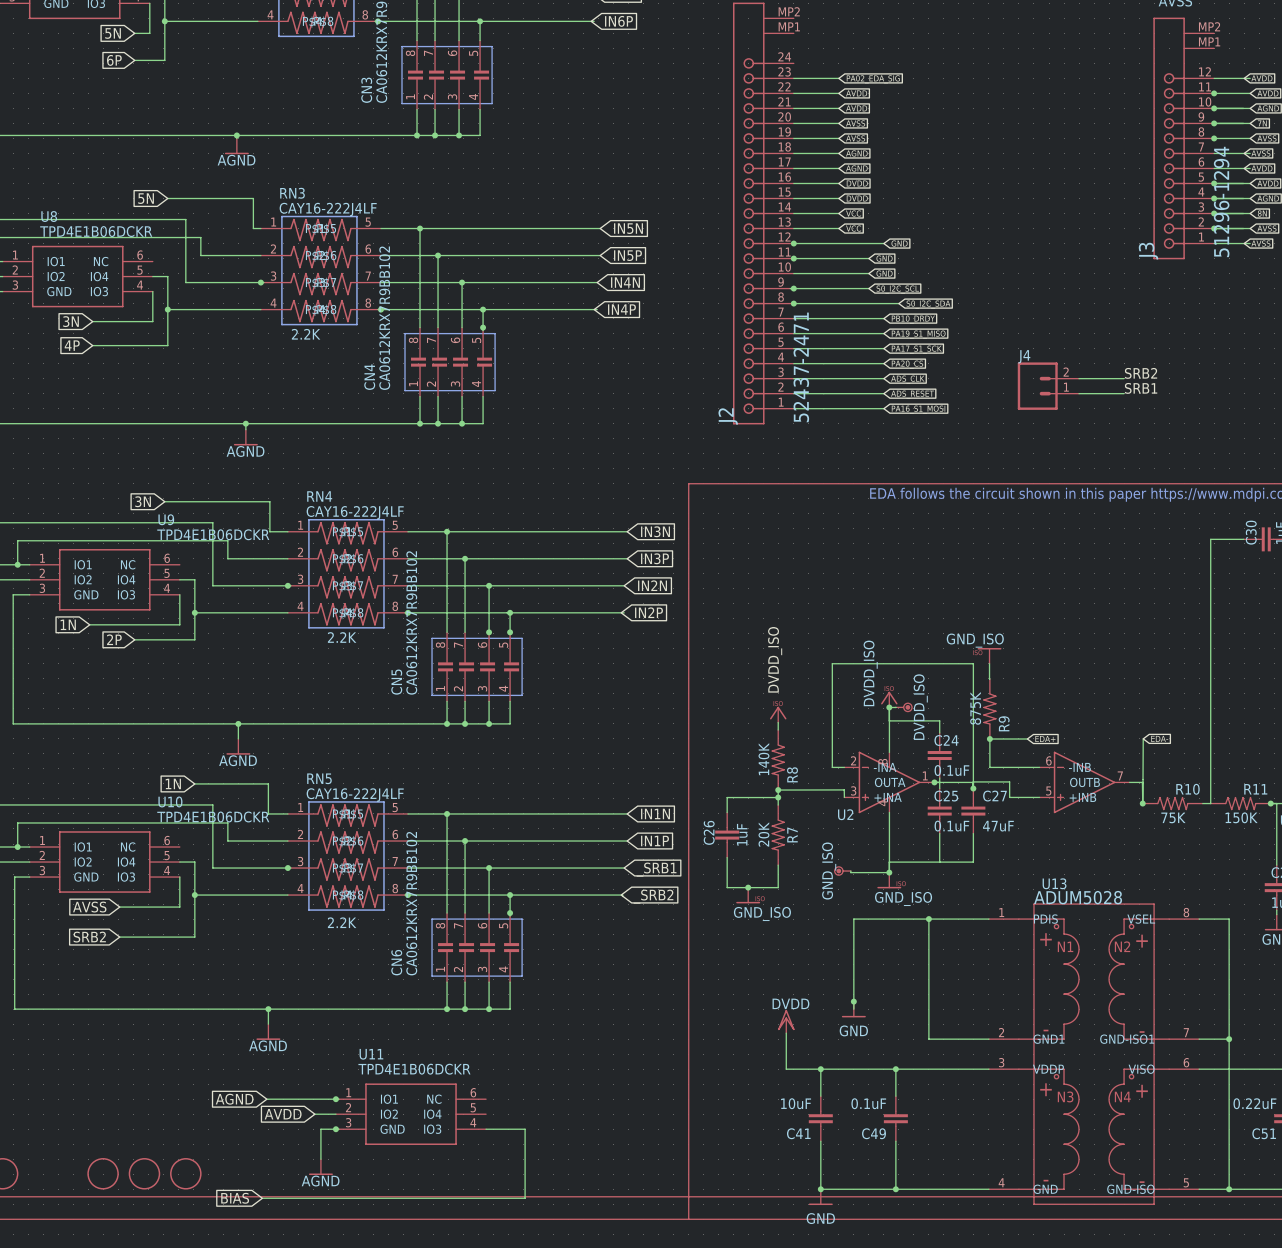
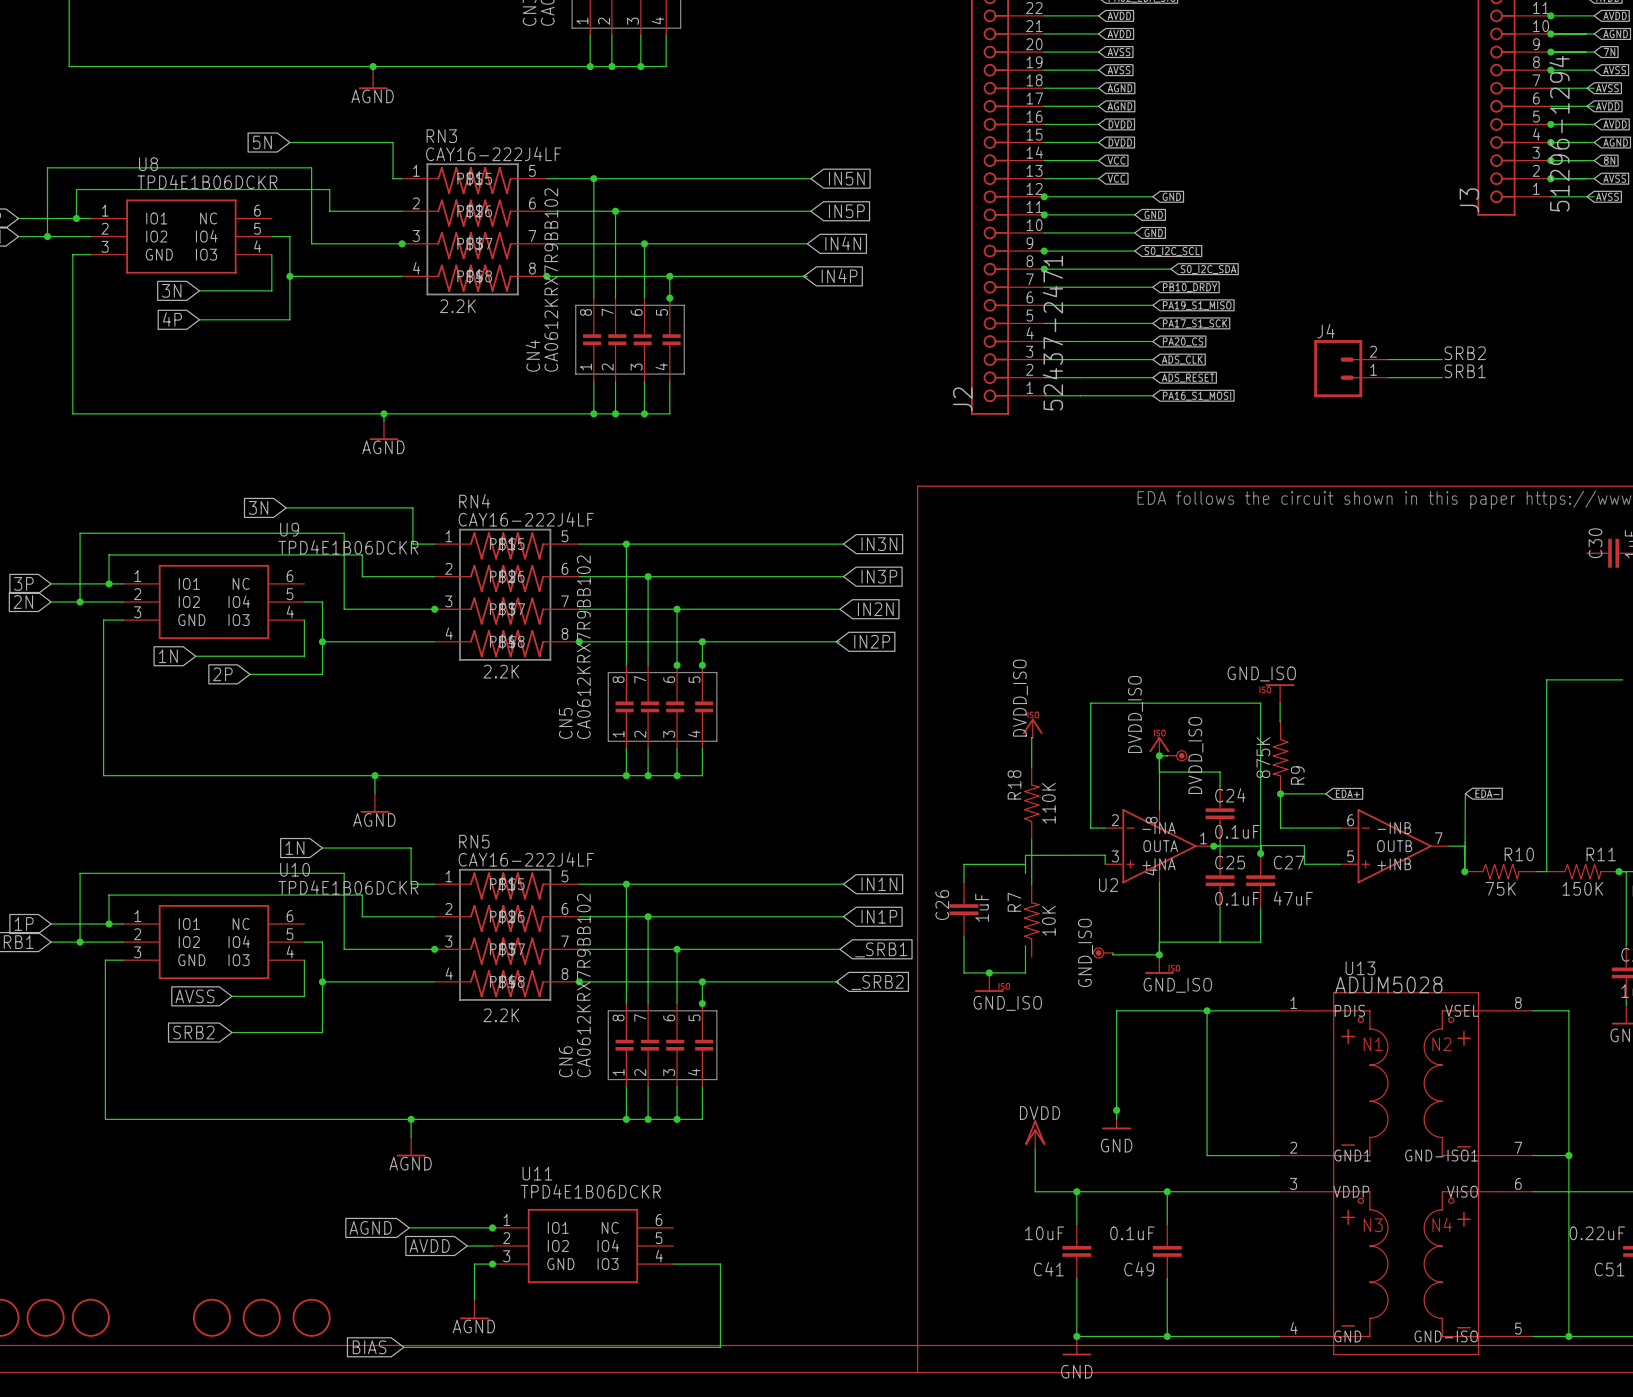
wire: (1243, 539) (1210, 539) (1210, 644) -> (1622, 679) (1546, 679)
wire: none -> (1032, 737) (1031, 767)
power symbol position: (778, 714) -> (1032, 728)
wire: (778, 722) (778, 730) -> none
R18: none -> 110K (1031, 803)
R8: 140K (778, 760) -> none
wire: none -> (1031, 839) (1031, 884)
junction: (778, 790) -> none
junction: (778, 797) -> none
R7 value: 20K (763, 834) -> 10K (1048, 920)
R7 rotation: 0° (778, 835) -> 180° (1031, 920)
R7 name position: R7 (792, 835) -> R7 (1014, 902)

